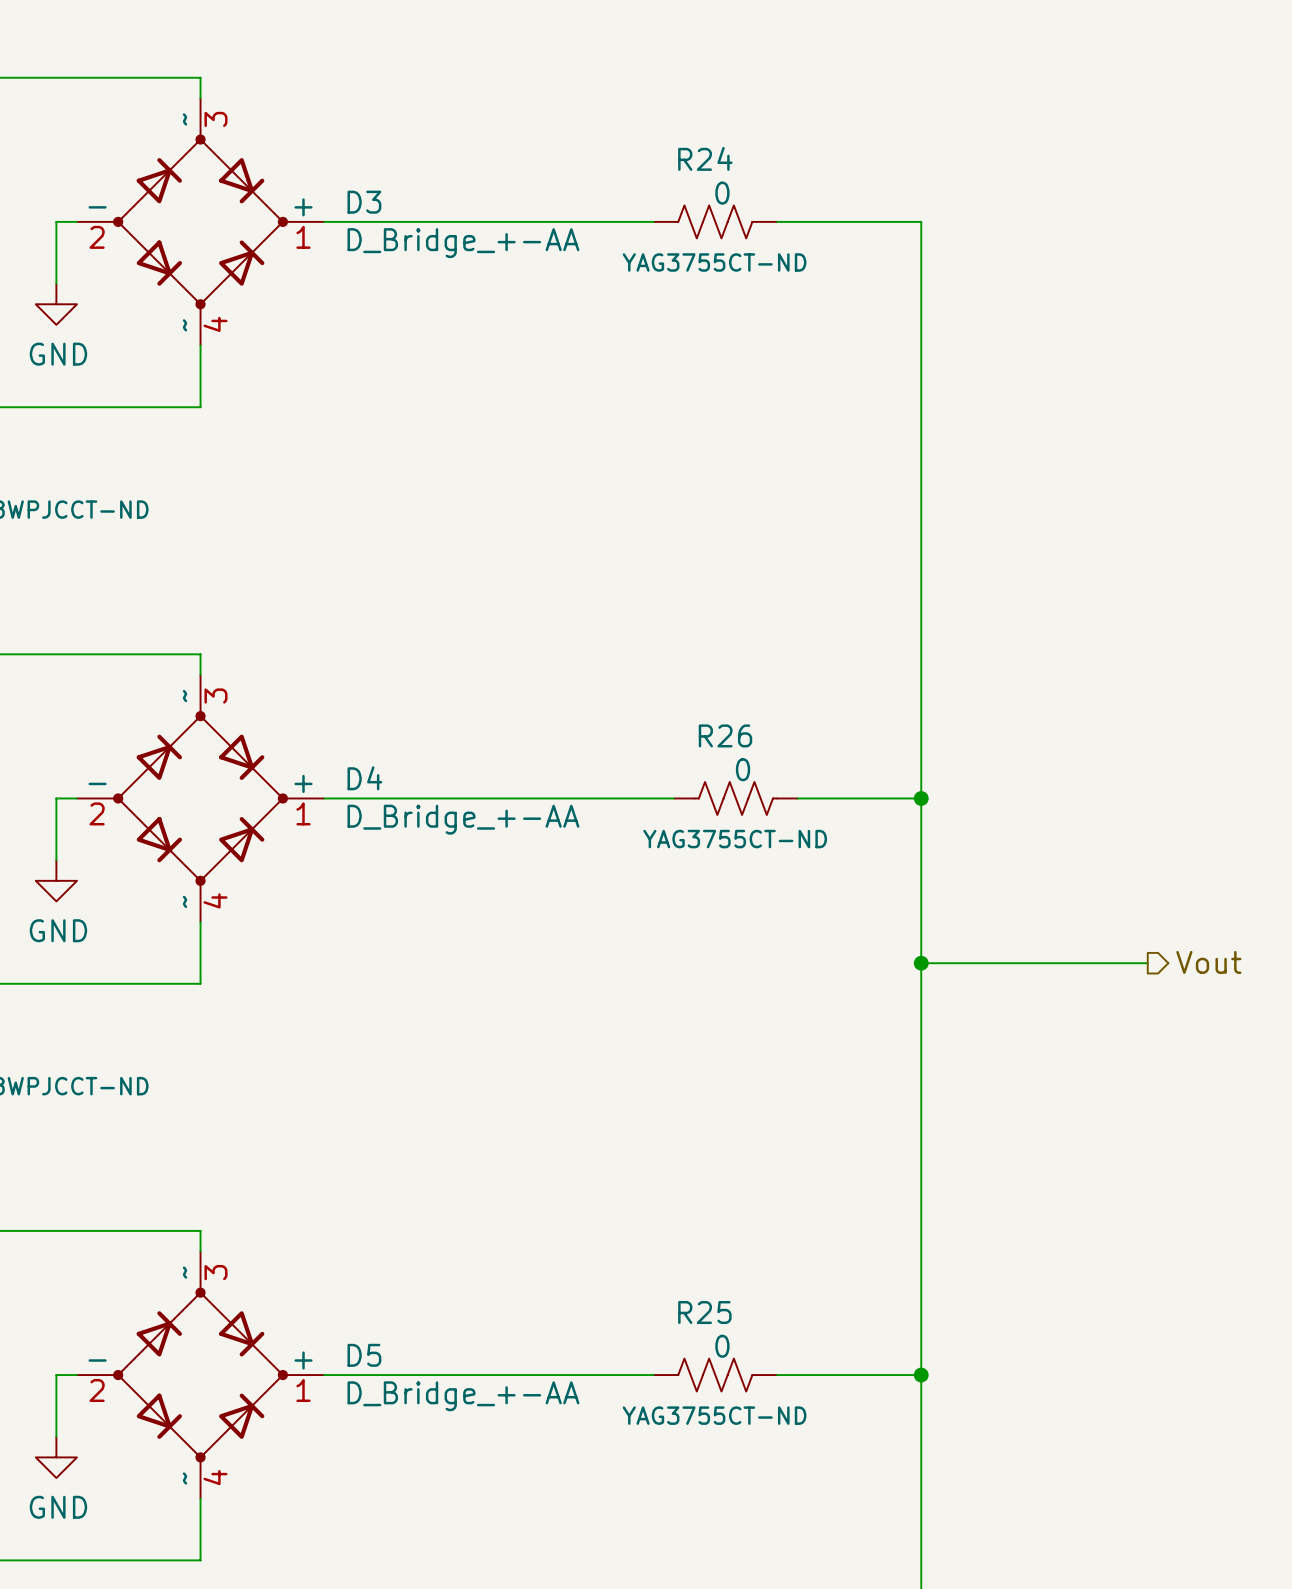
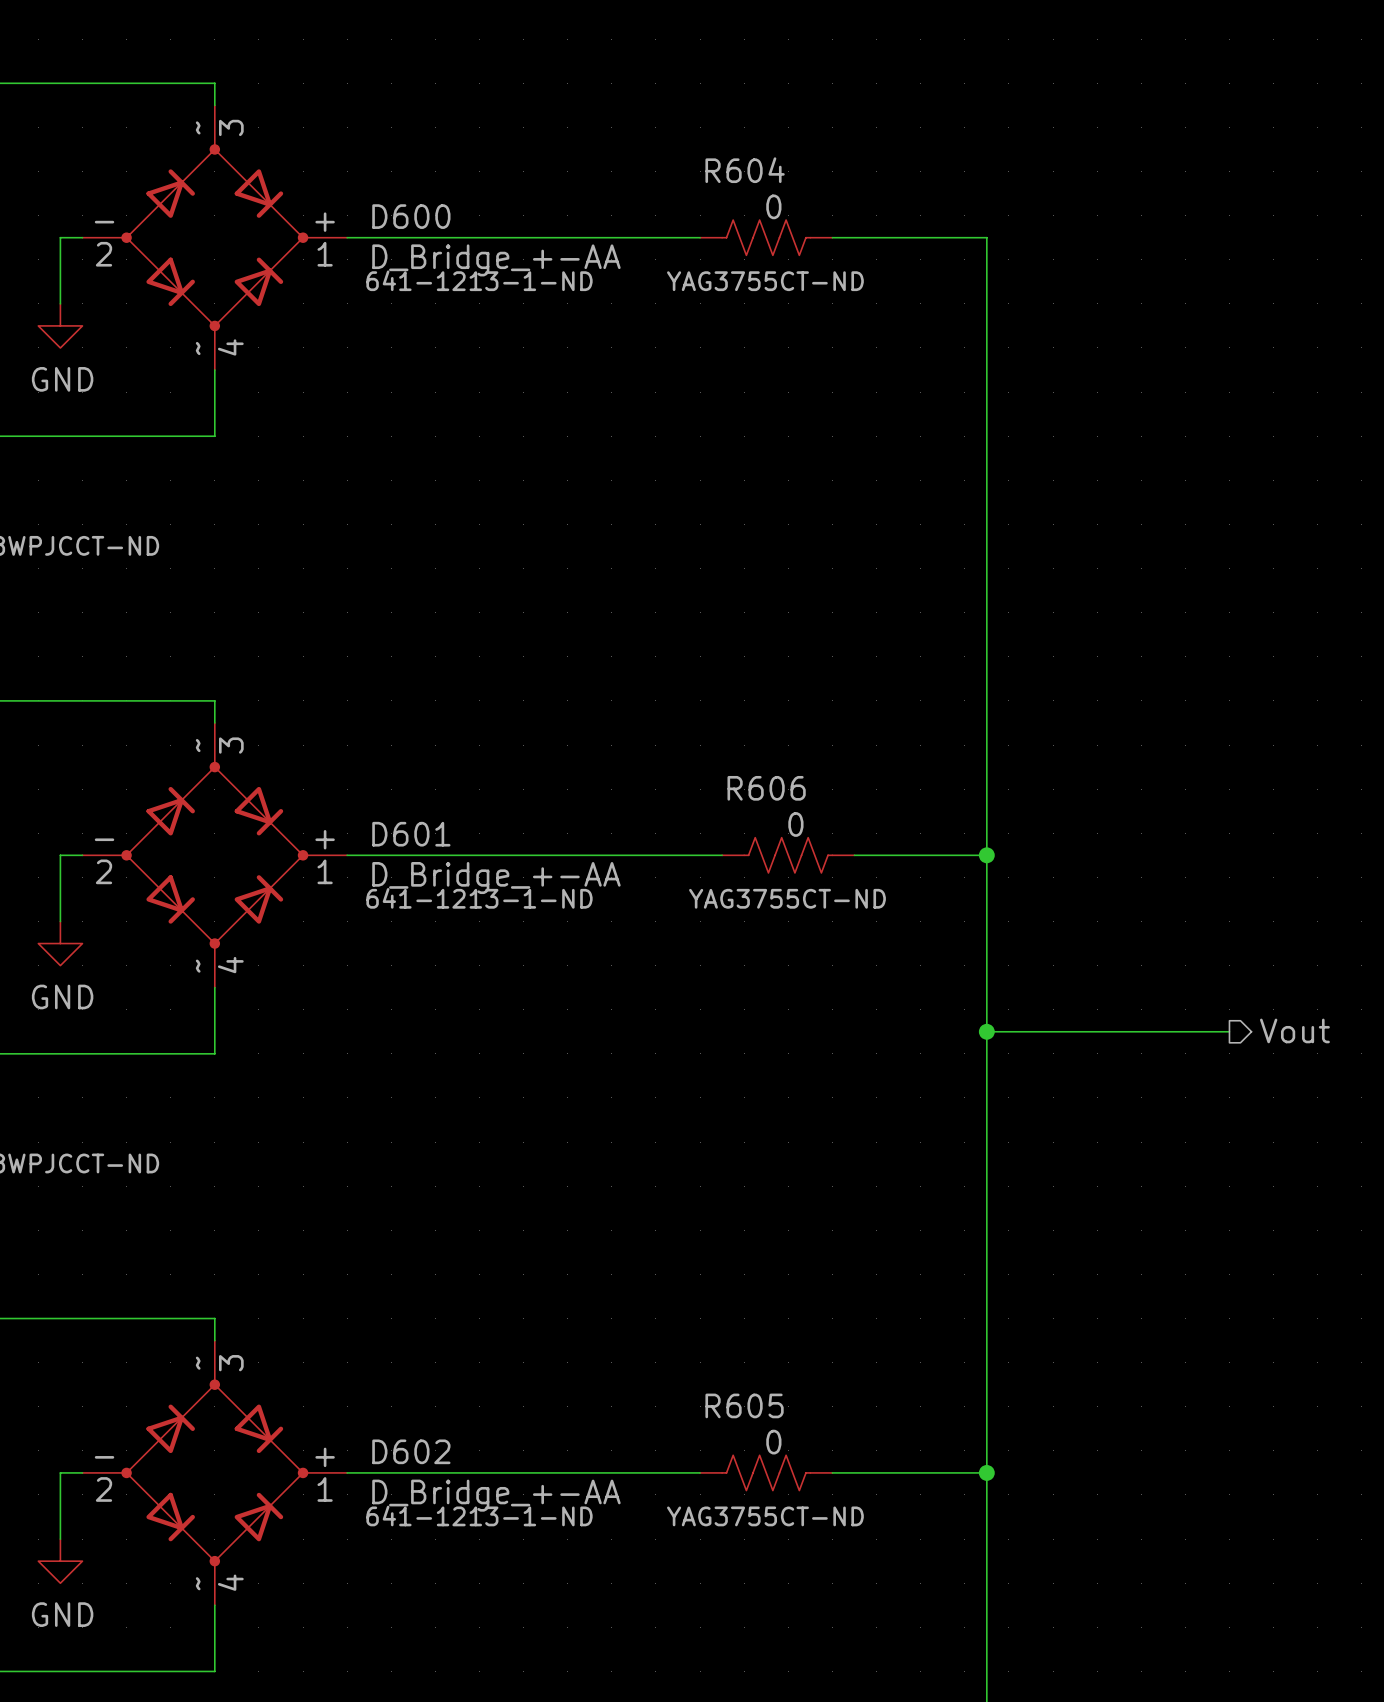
R24 name: R24 (705, 158) -> R604 (745, 170)
D3 name: D3 (364, 202) -> D600 (411, 216)
D3 text: none -> 641-1213-1-ND (479, 280)
R26 name: R26 (725, 735) -> R606 (766, 788)
D4 name: D4 (364, 778) -> D601 (411, 834)
D4 text: none -> 641-1213-1-ND (479, 898)
R25 name: R25 (704, 1312) -> R605 (744, 1405)
D5 name: D5 (364, 1355) -> D602 (411, 1451)
D5 text: none -> 641-1213-1-ND (479, 1515)

